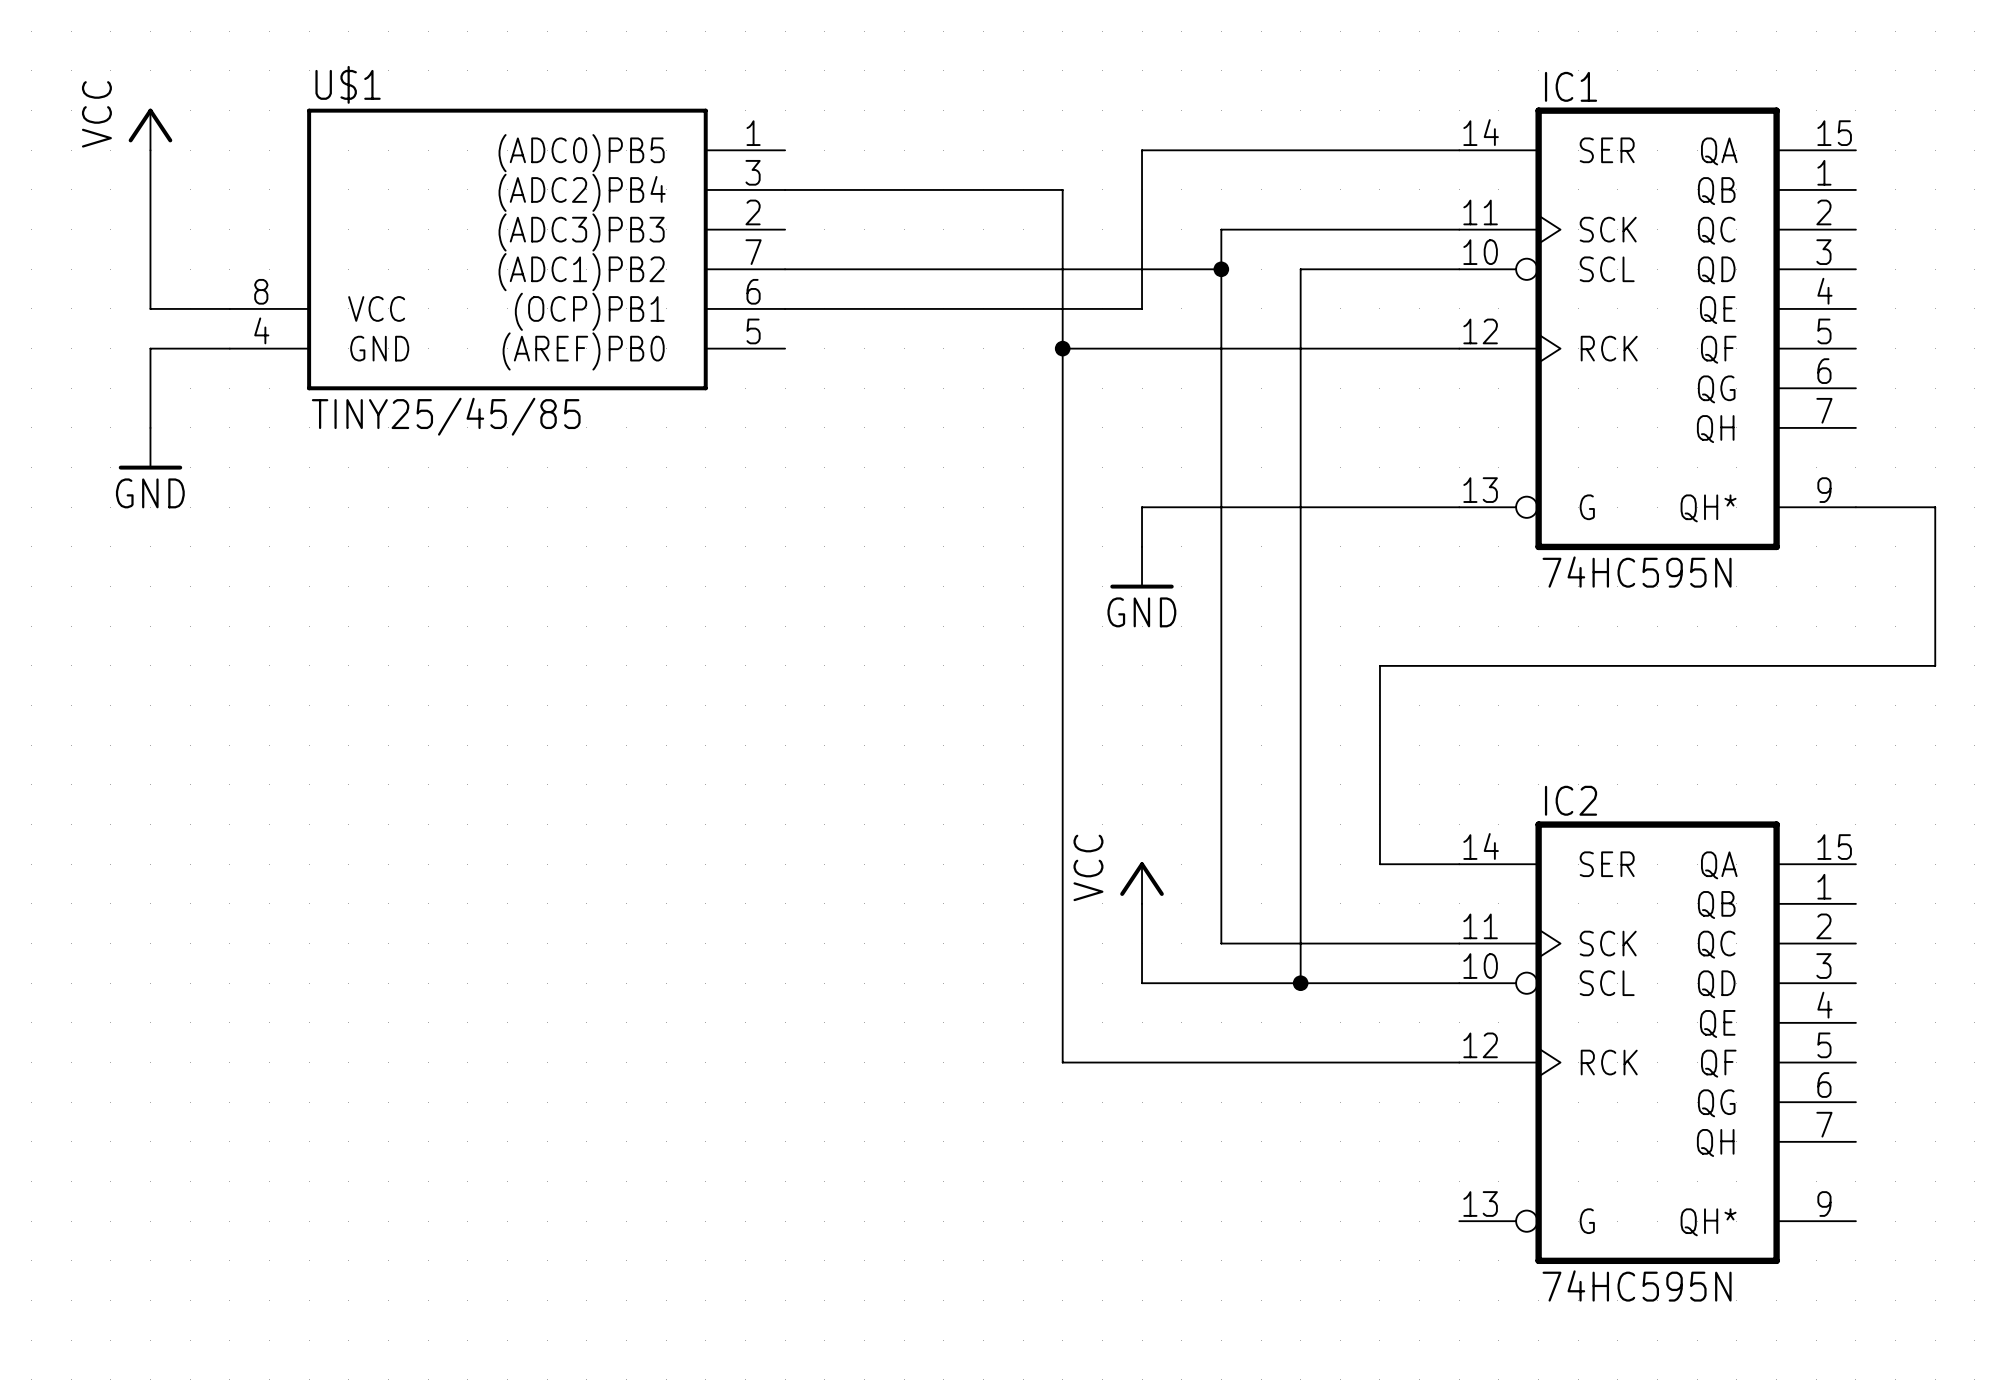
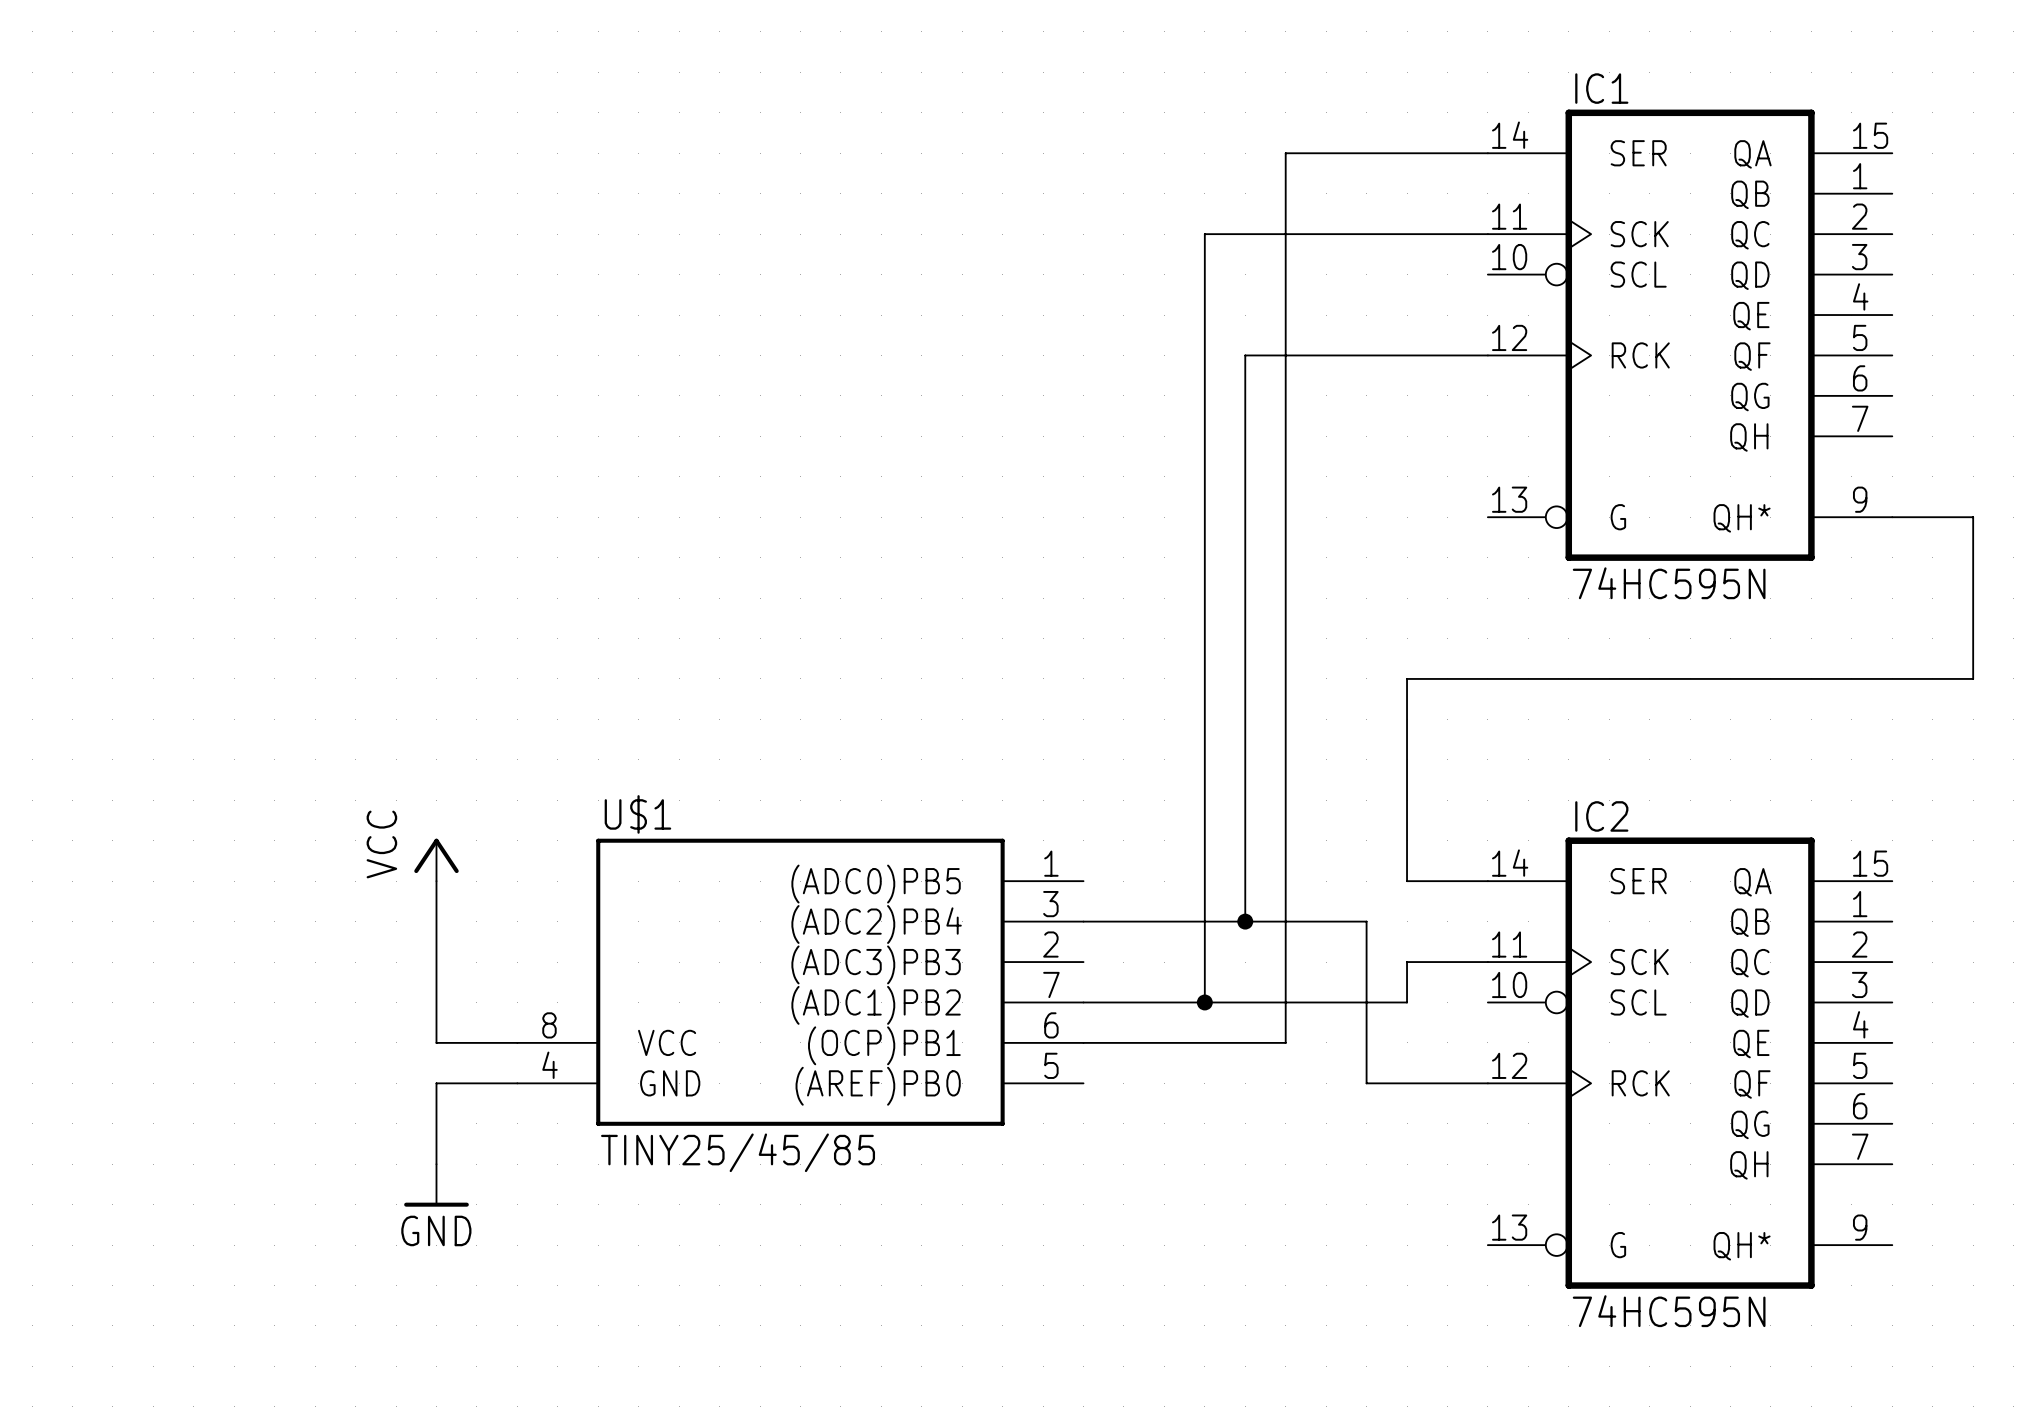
power symbol: VCC (150, 129) -> none
wire: (150, 150) (150, 308) (229, 308) -> none
wire: (1261, 150) (1142, 150) (1142, 308) (785, 308) -> (1285, 153) (1285, 1042) (1083, 1042)
wire: (785, 189) (1062, 189) (1062, 1062) (1340, 1062) -> (1083, 921) (1366, 921) (1366, 1083)
wire: (1221, 229) (1221, 348) (1062, 348) -> (1245, 234) (1204, 234) (1204, 1002)
U$1 position: (507, 249) -> (800, 982)
wire: (785, 269) (1221, 269) -> none
junction: (1221, 269) -> none
wire: (1459, 269) (1300, 269) (1300, 983) -> none
wire: (229, 348) (150, 348) (150, 427) -> none
junction: (1062, 348) -> none
power symbol: GND (150, 448) -> none
wire: (1459, 507) (1142, 507) (1142, 546) -> none
power symbol: GND (1142, 567) -> none
power symbol: none -> VCC (436, 859)
wire: none -> (436, 881) (436, 1042) (517, 1042)
power symbol: VCC (1142, 883) -> none
wire: (1142, 903) (1142, 983) -> (1083, 1002) (1164, 1002)
wire: (1221, 903) (1221, 943) (1379, 943) -> none
junction: none -> (1245, 921)
junction: none -> (1204, 1002)
junction: (1300, 983) -> none
wire: (1379, 983) (1459, 983) -> (1407, 1002) (1407, 962)
wire: none -> (517, 1083) (436, 1083) (436, 1164)
power symbol: none -> GND (436, 1185)

